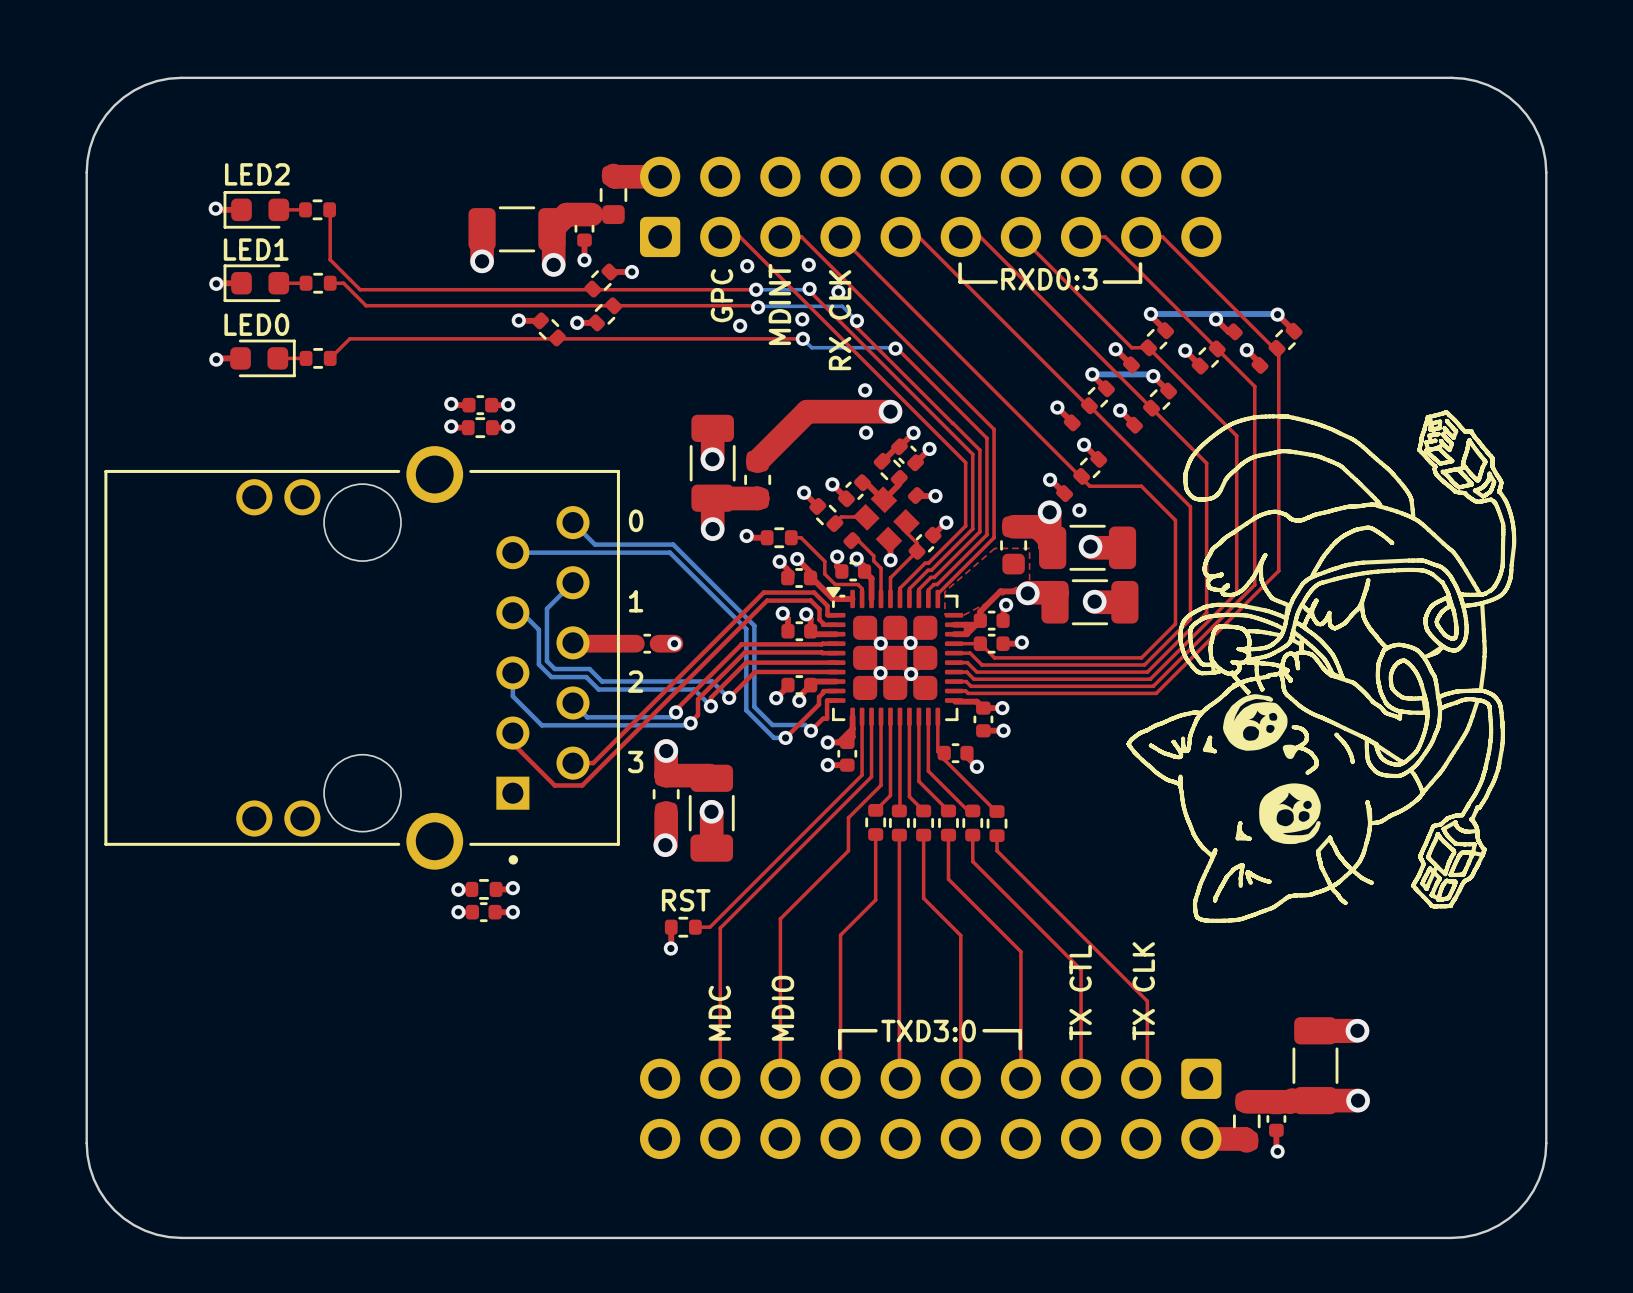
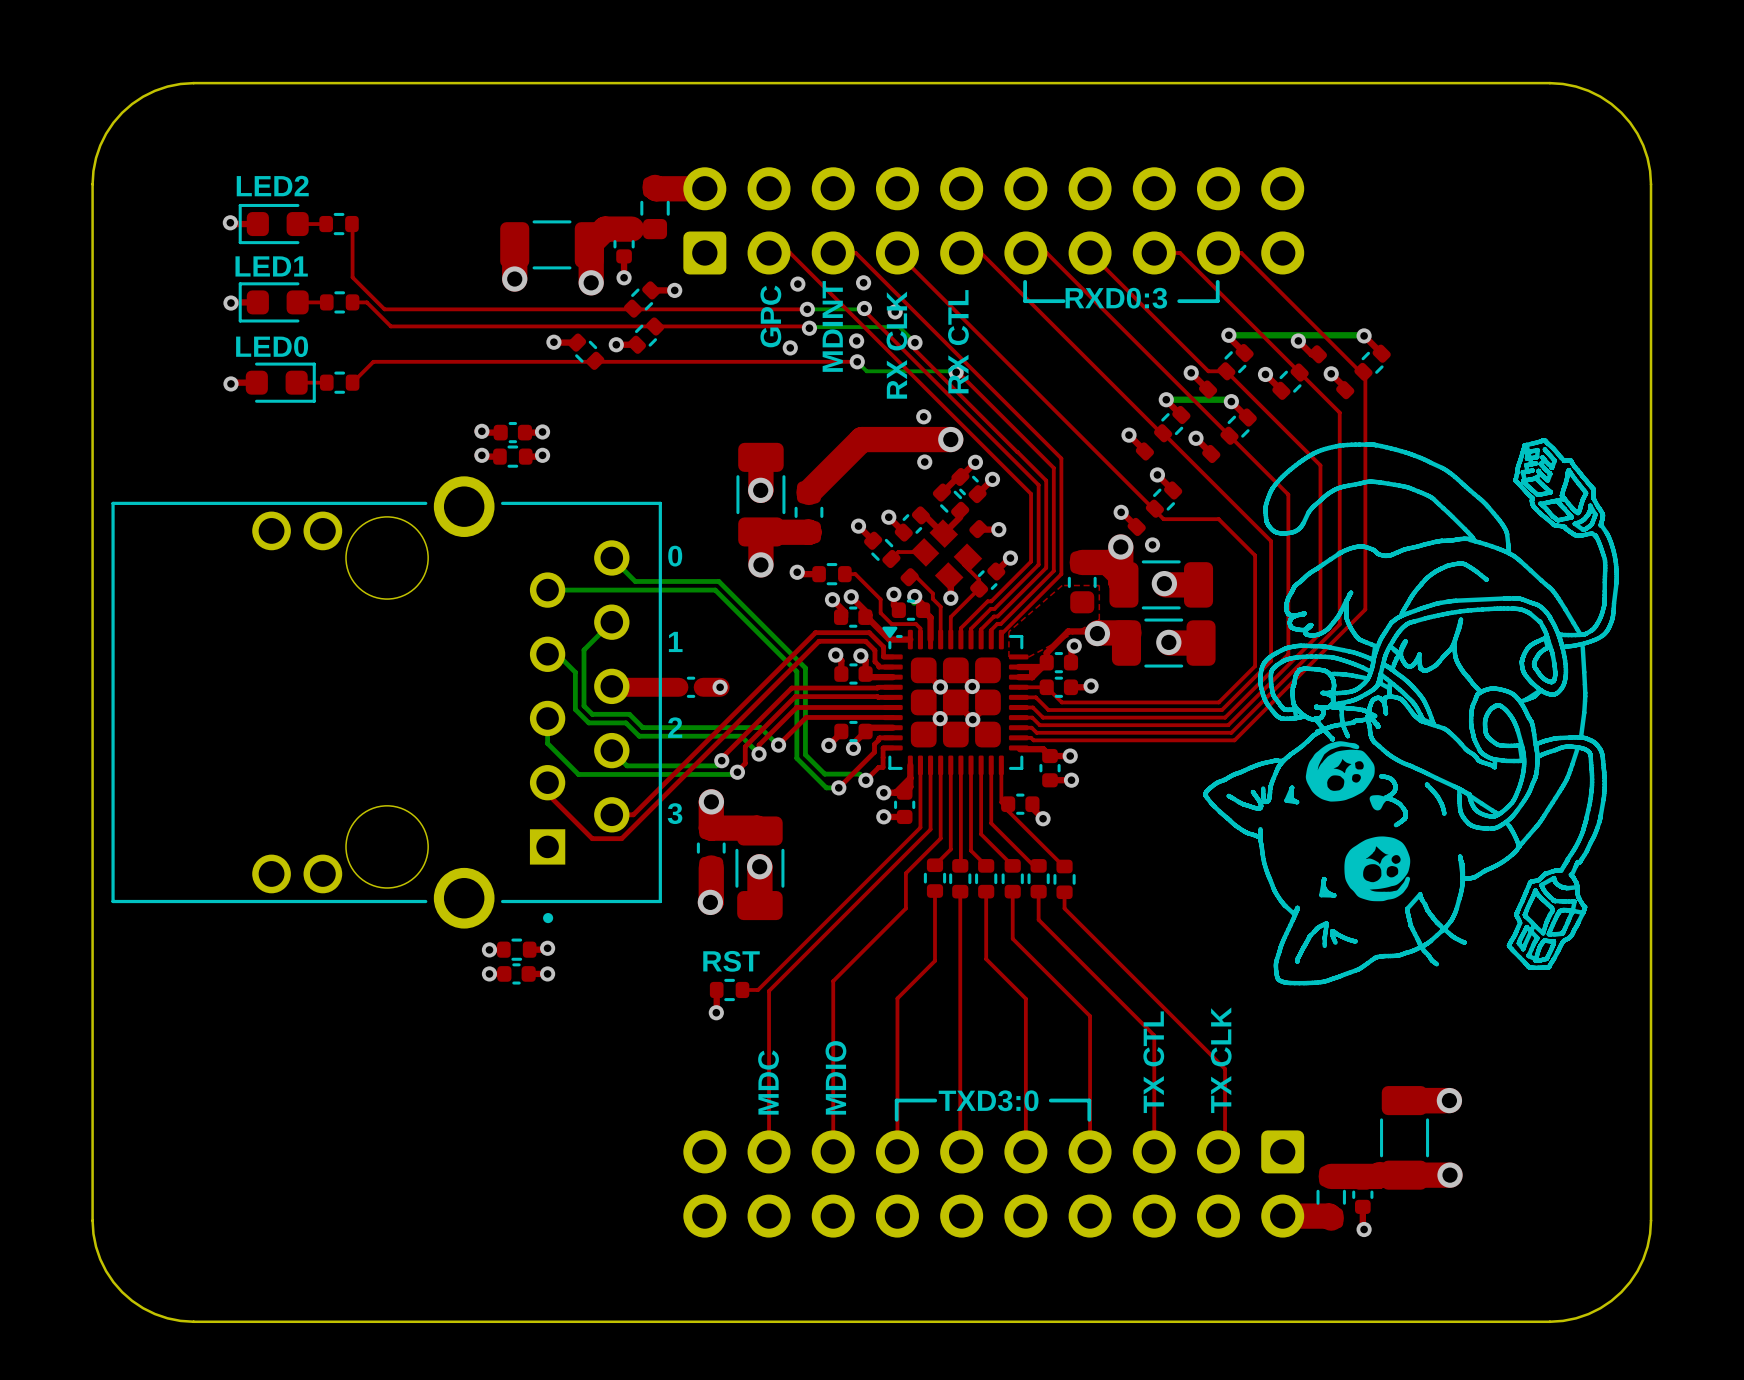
text: none -> RX CTL (958, 341)

